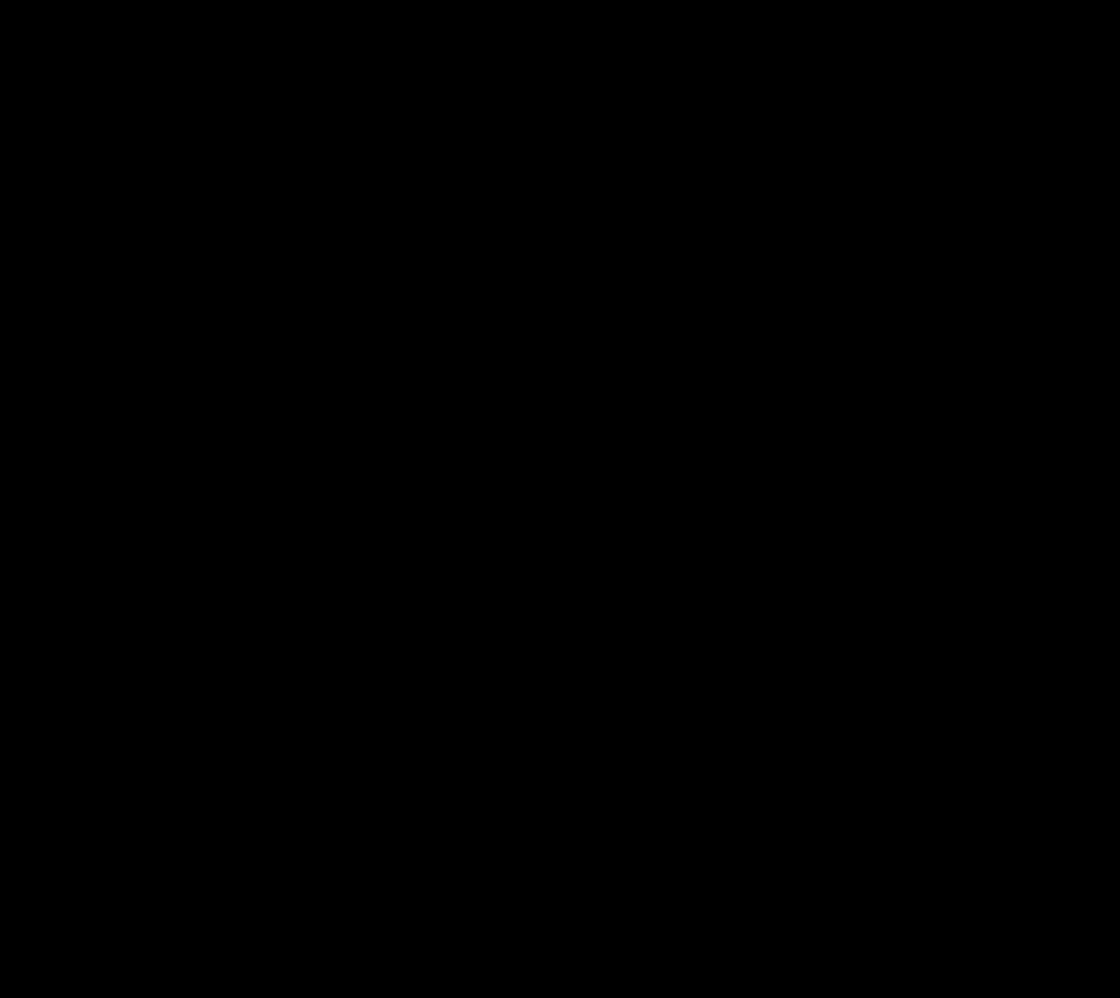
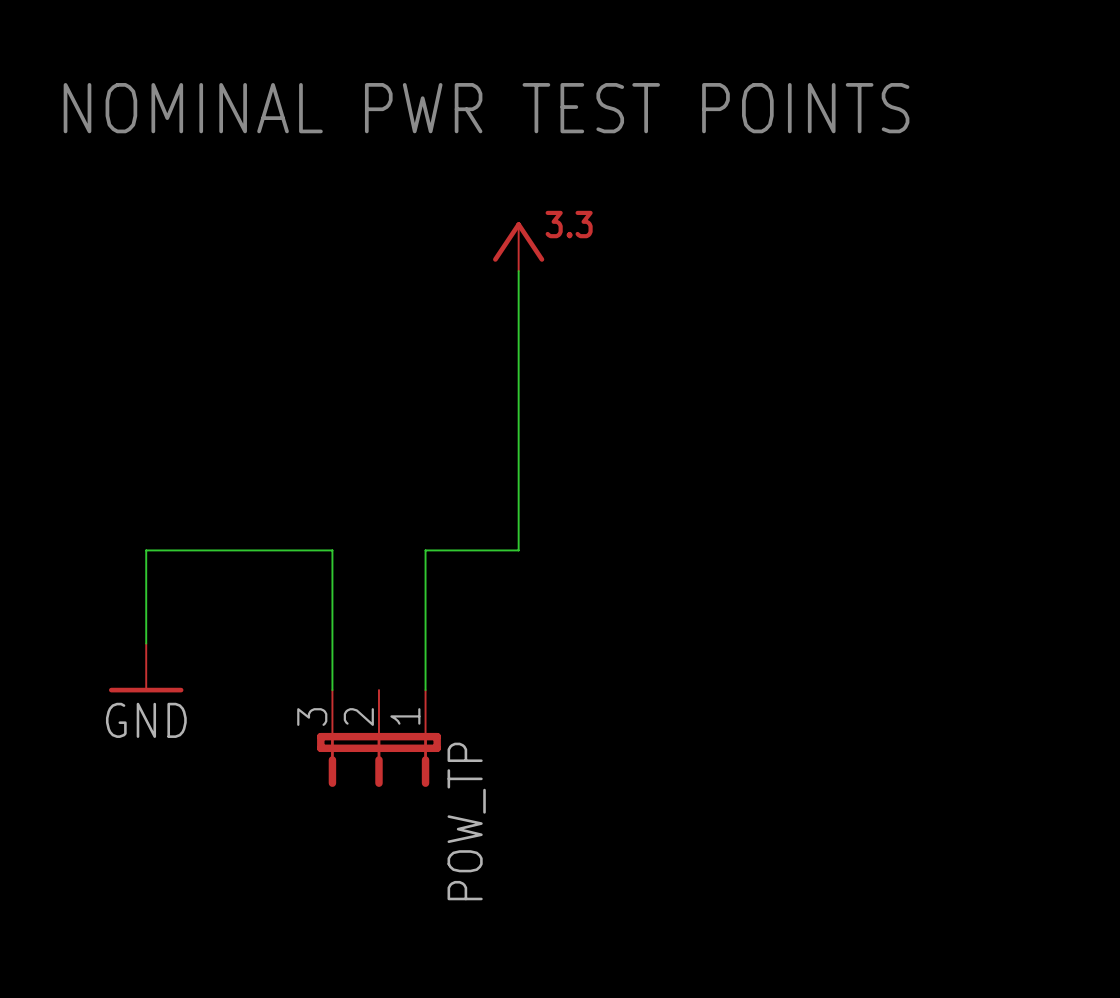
text: none -> NOMINAL PWR TEST POINTS (486, 108)
power symbol: none -> (518, 246)
wire: none -> (518, 271) (518, 550) (425, 550) (425, 690)
wire: none -> (146, 643) (146, 550) (332, 550) (332, 690)
power symbol: none -> GND (146, 667)
POW_TP: none -> (378, 738)

